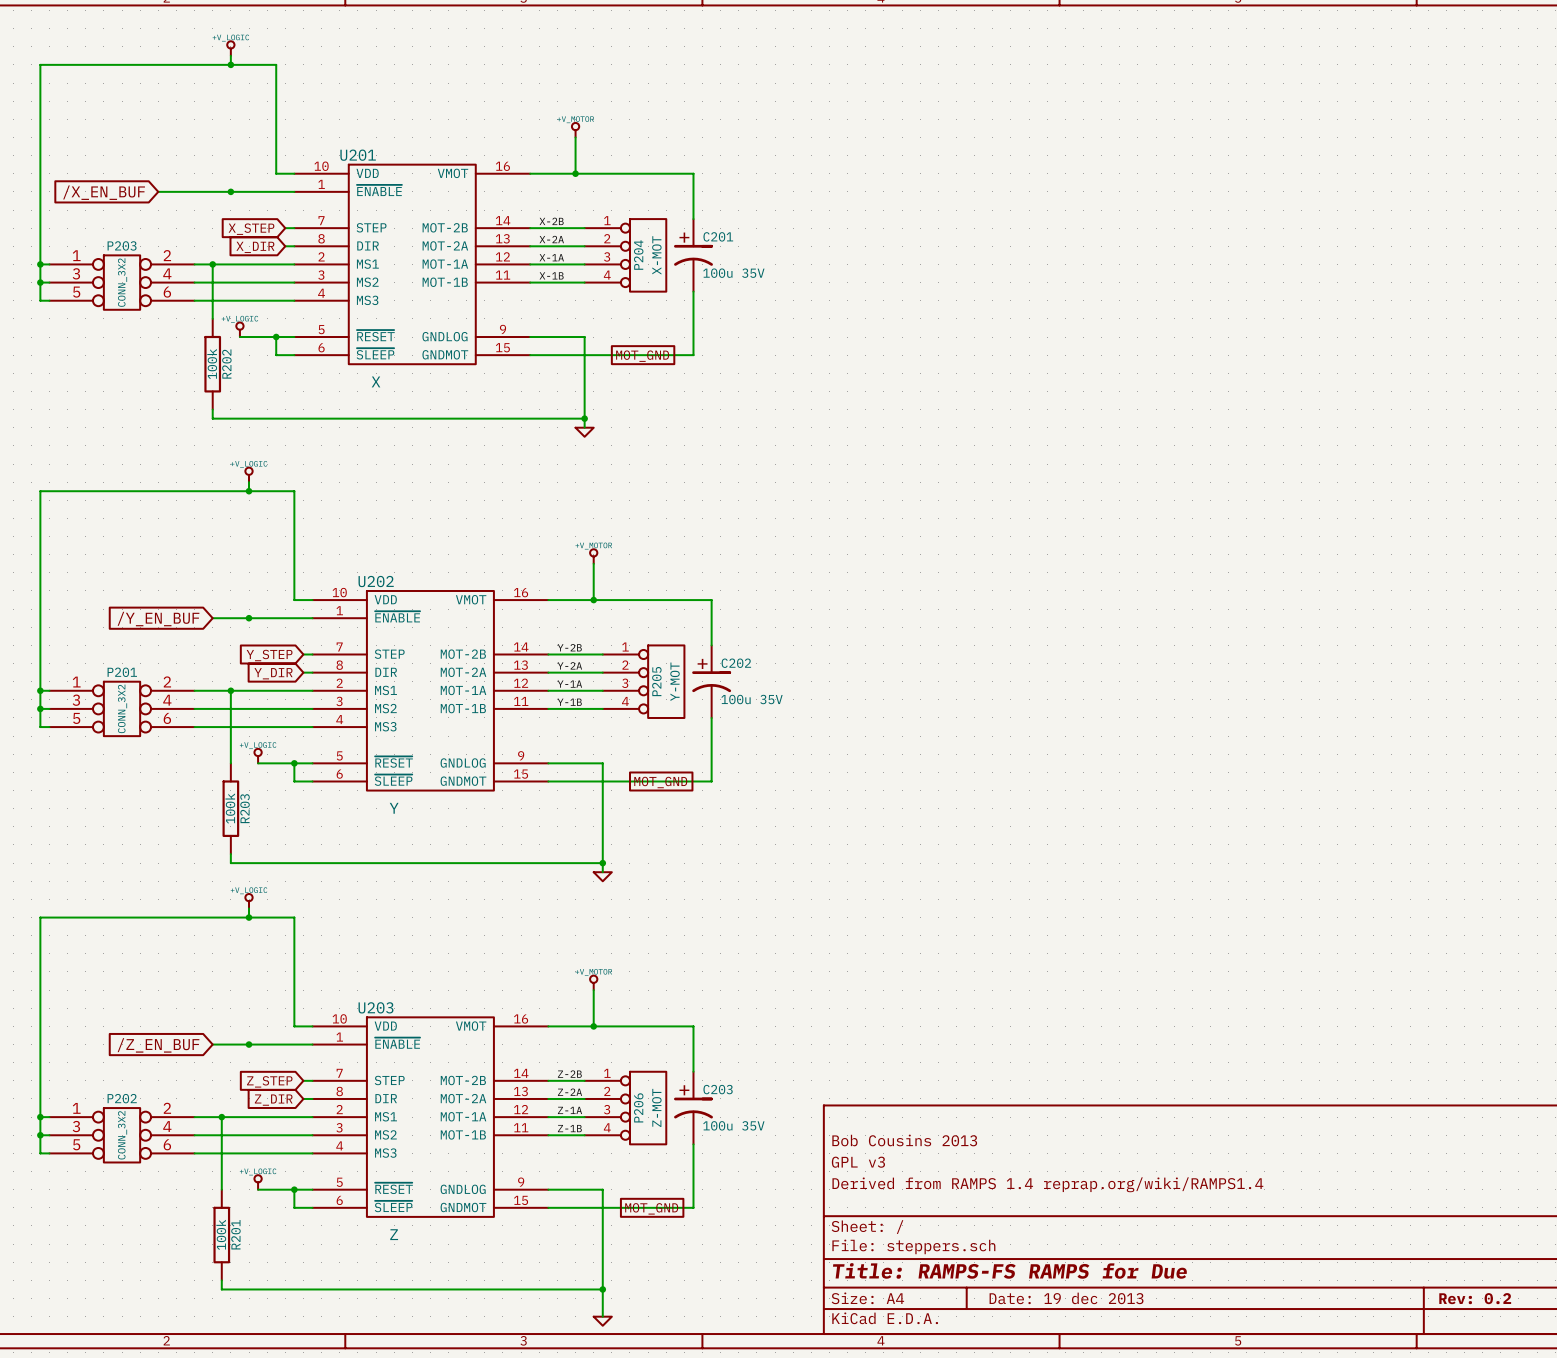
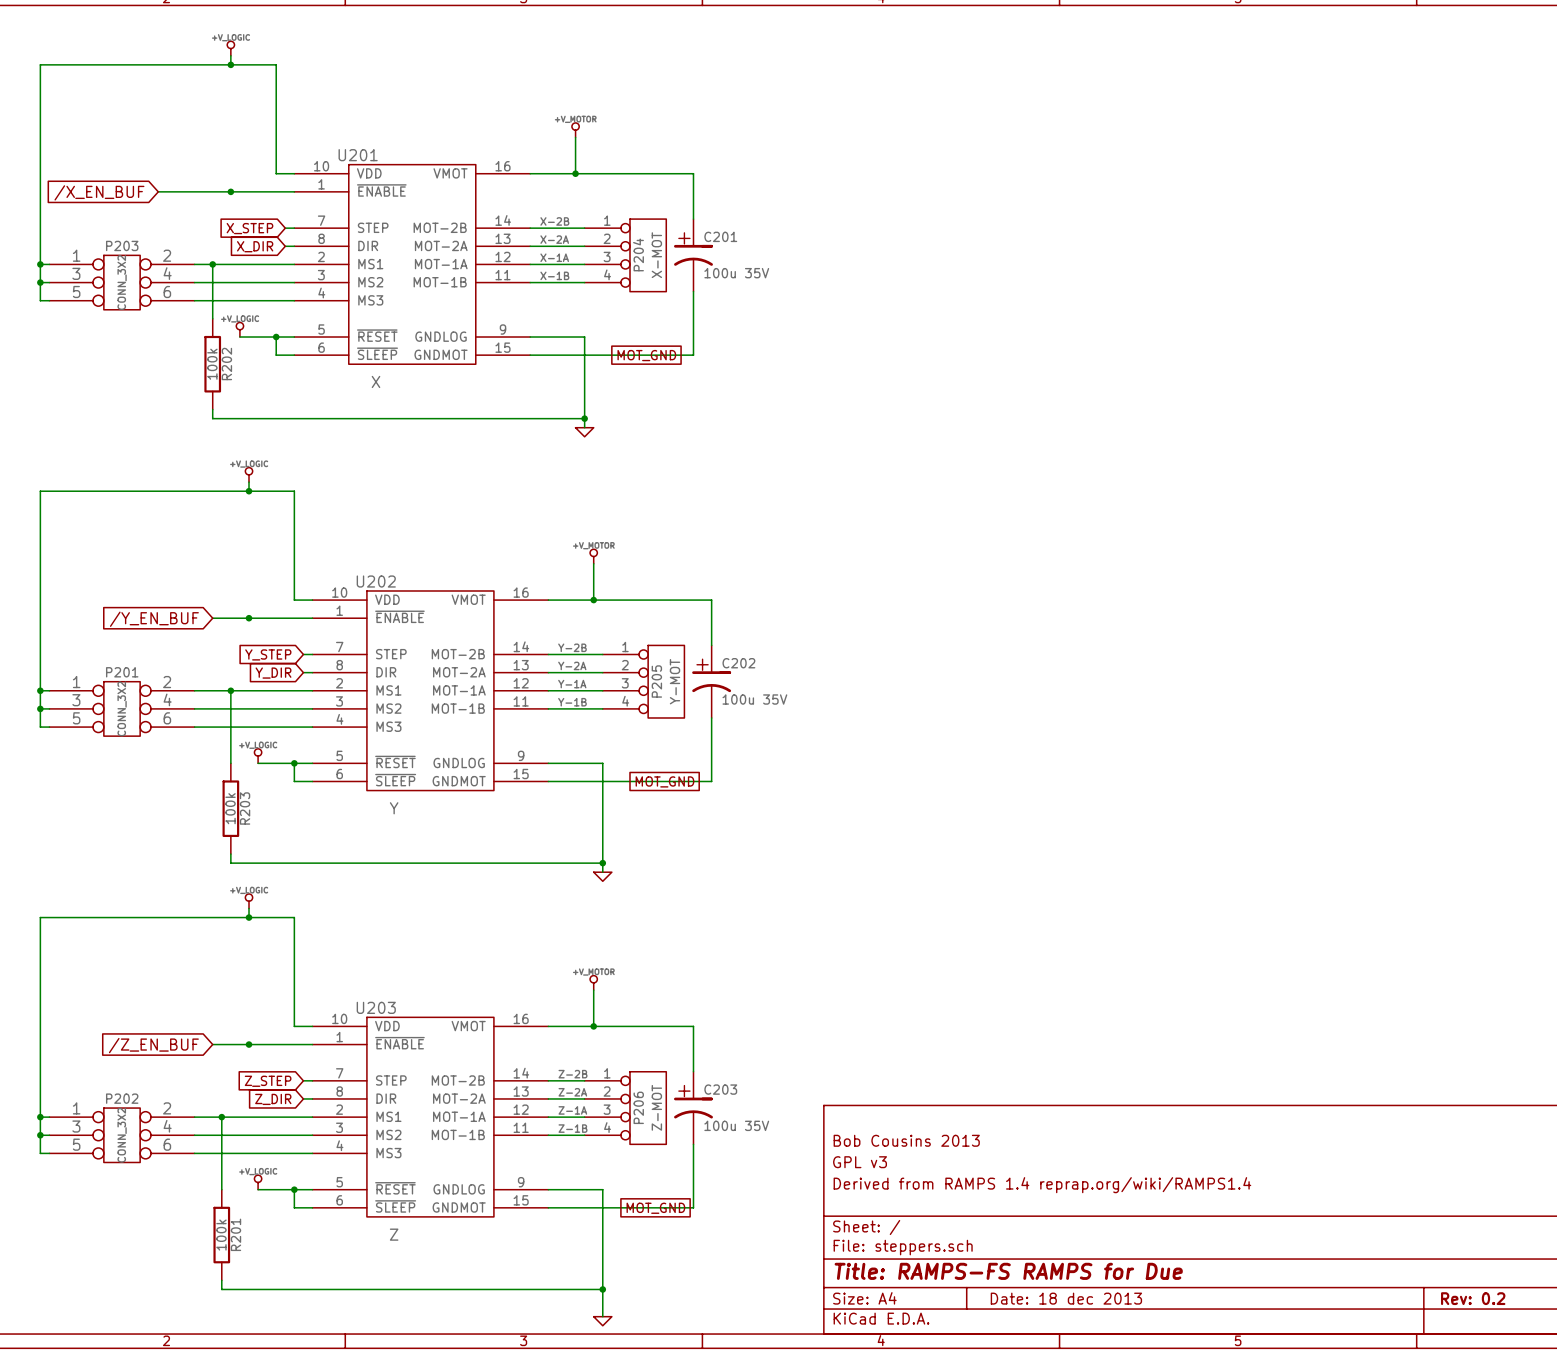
title block: Date: 19 dec 2013 (1066, 1298) -> Date: 18 dec 2013 (1066, 1298)

